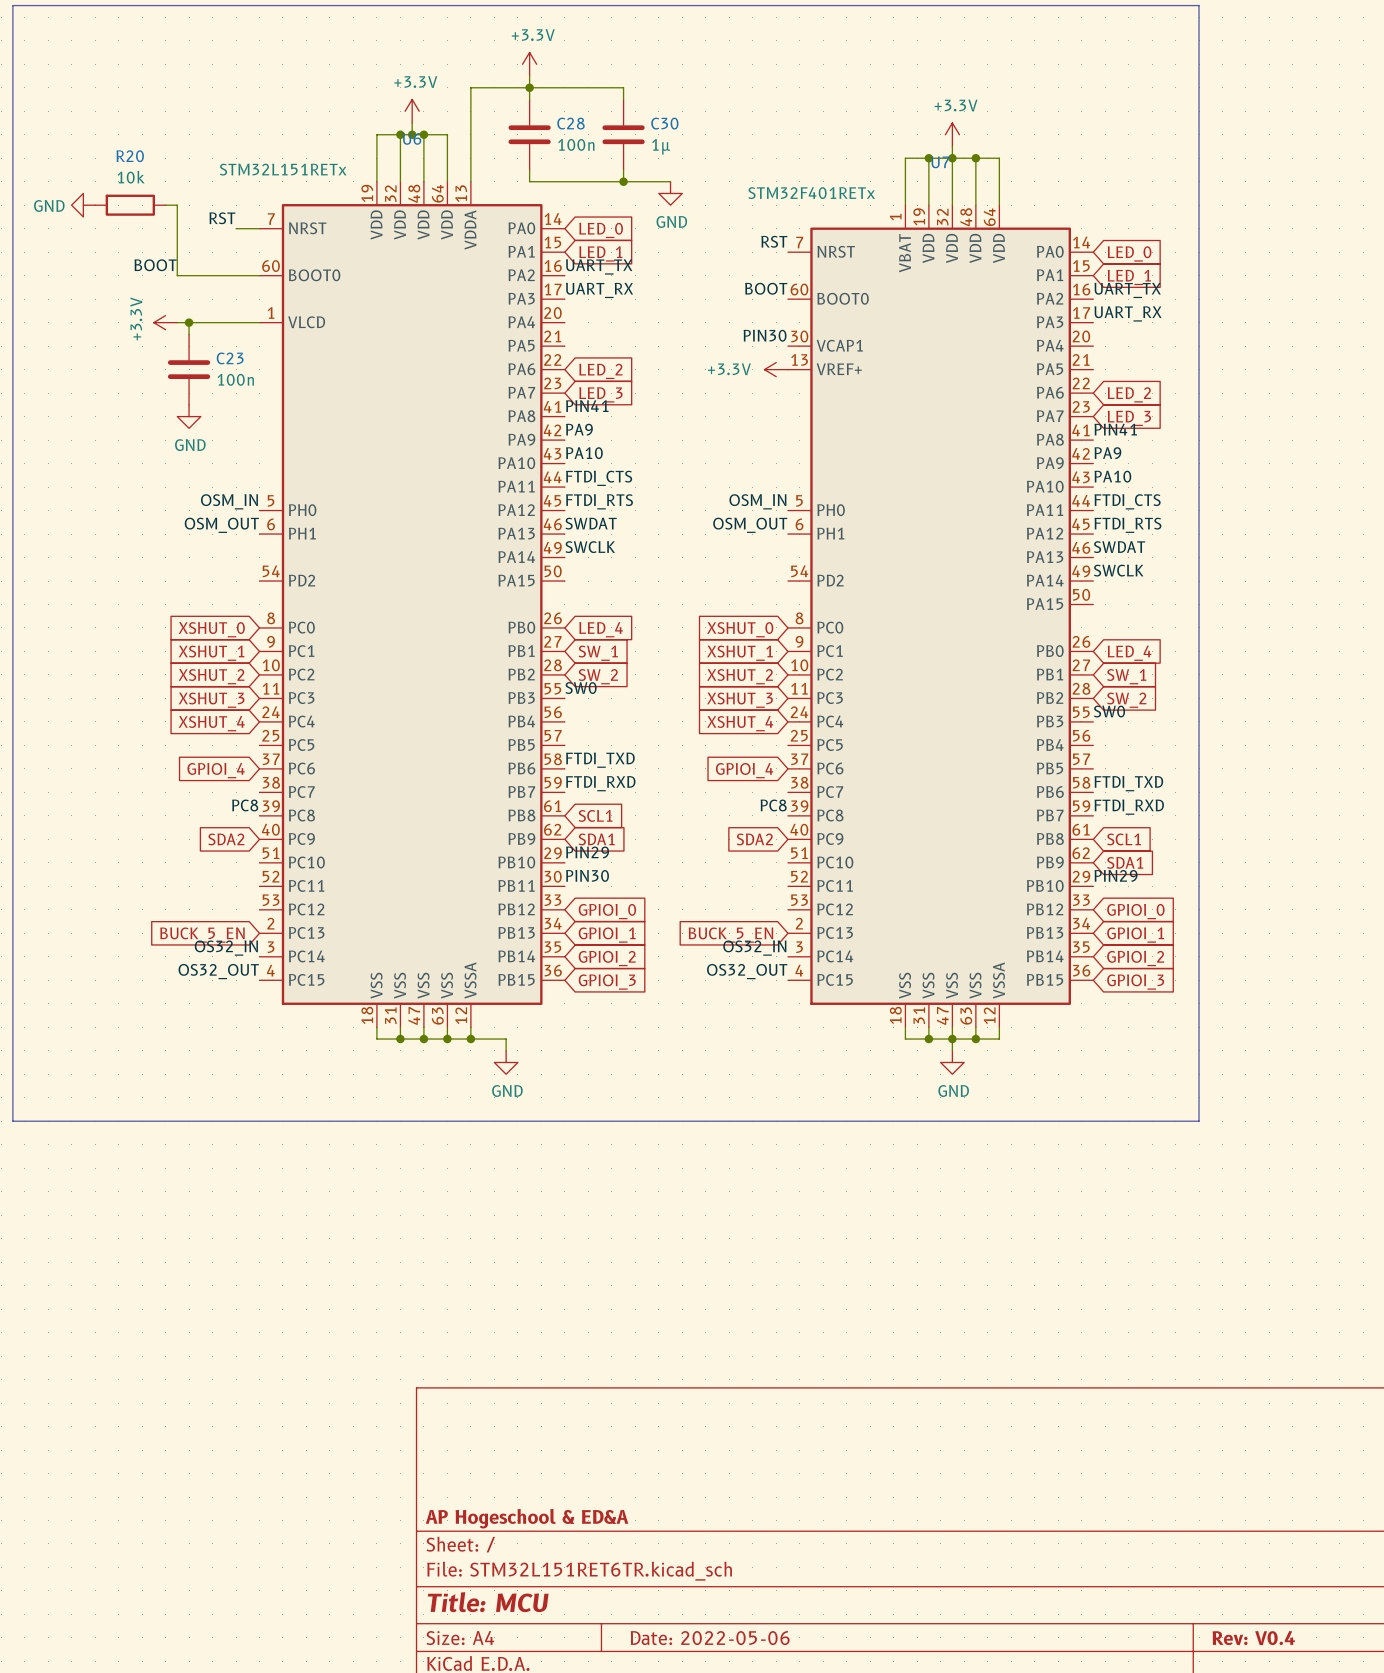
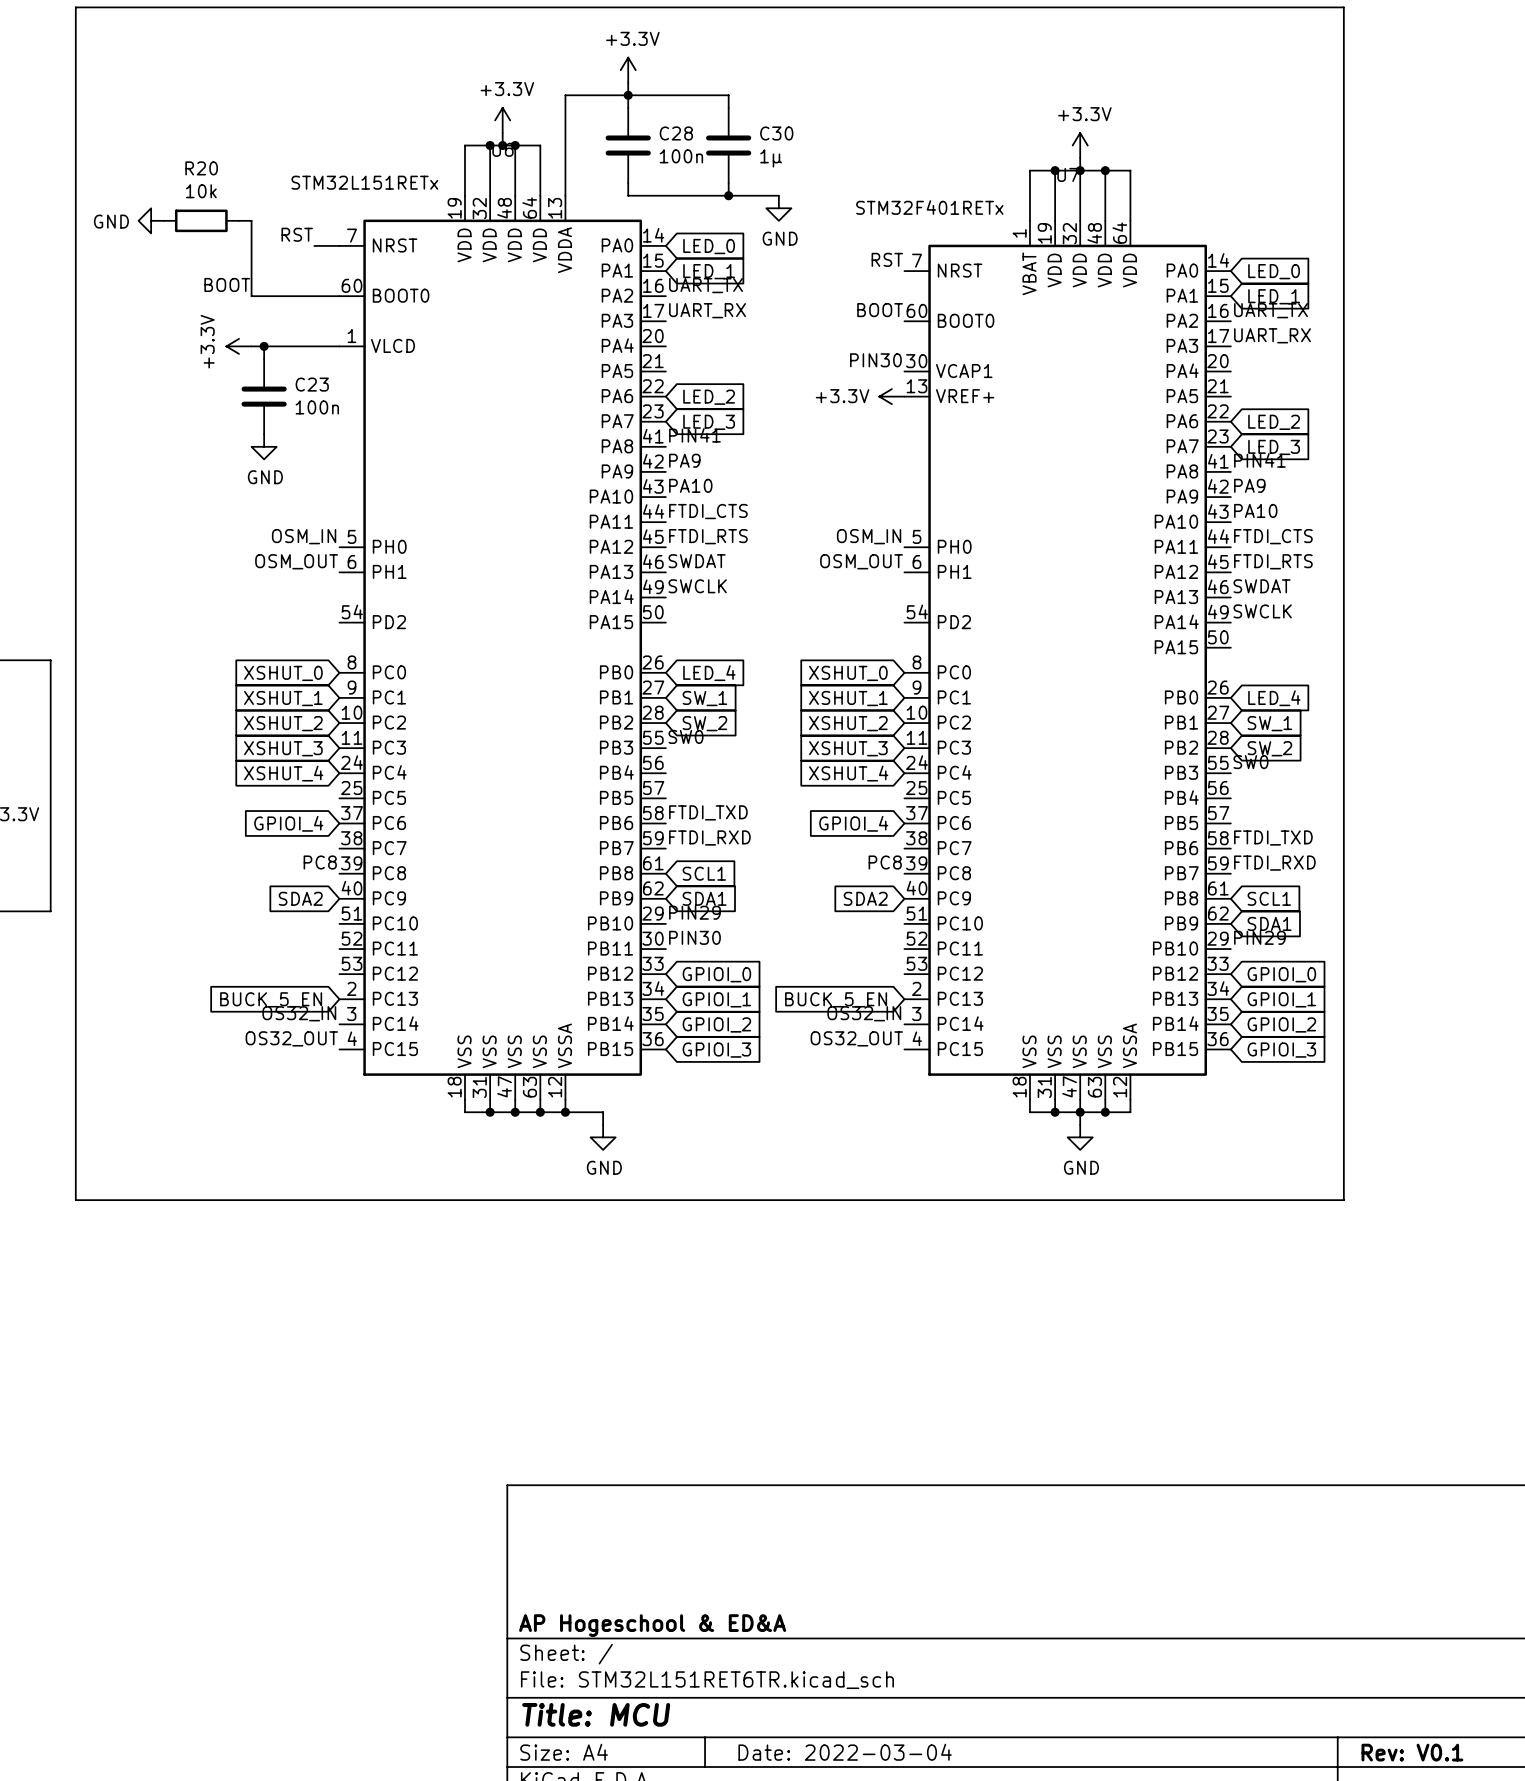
title block: Date: 2022-05-06 (710, 1638) -> Date: 2022-03-04 (845, 1752)
title block: Rev: V0.4 (1253, 1638) -> Rev: V0.1 (1412, 1752)

